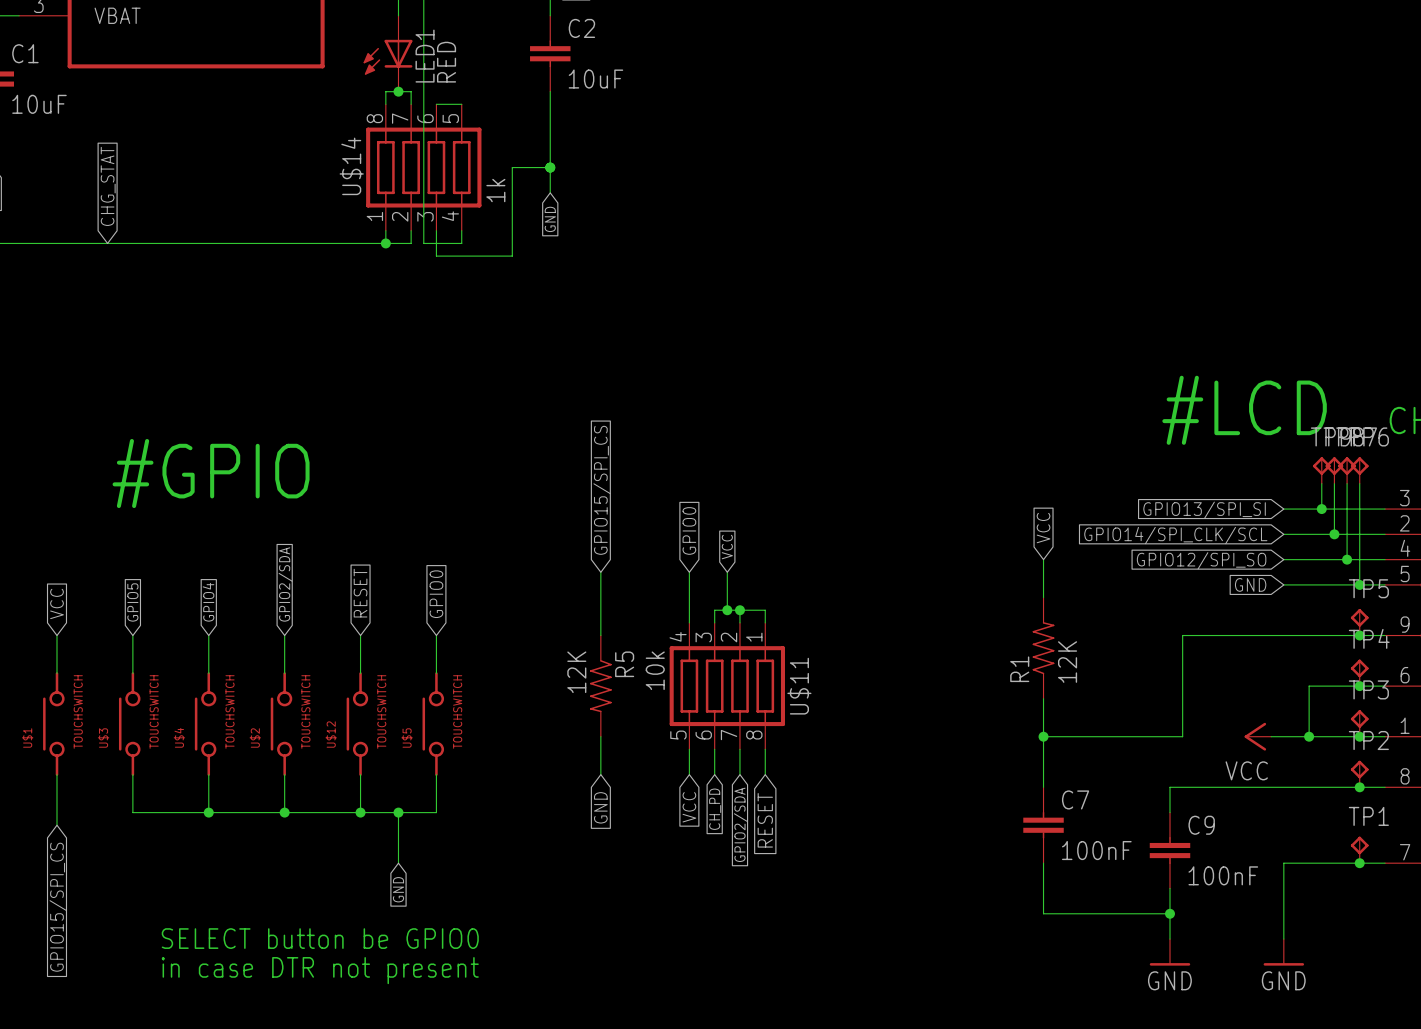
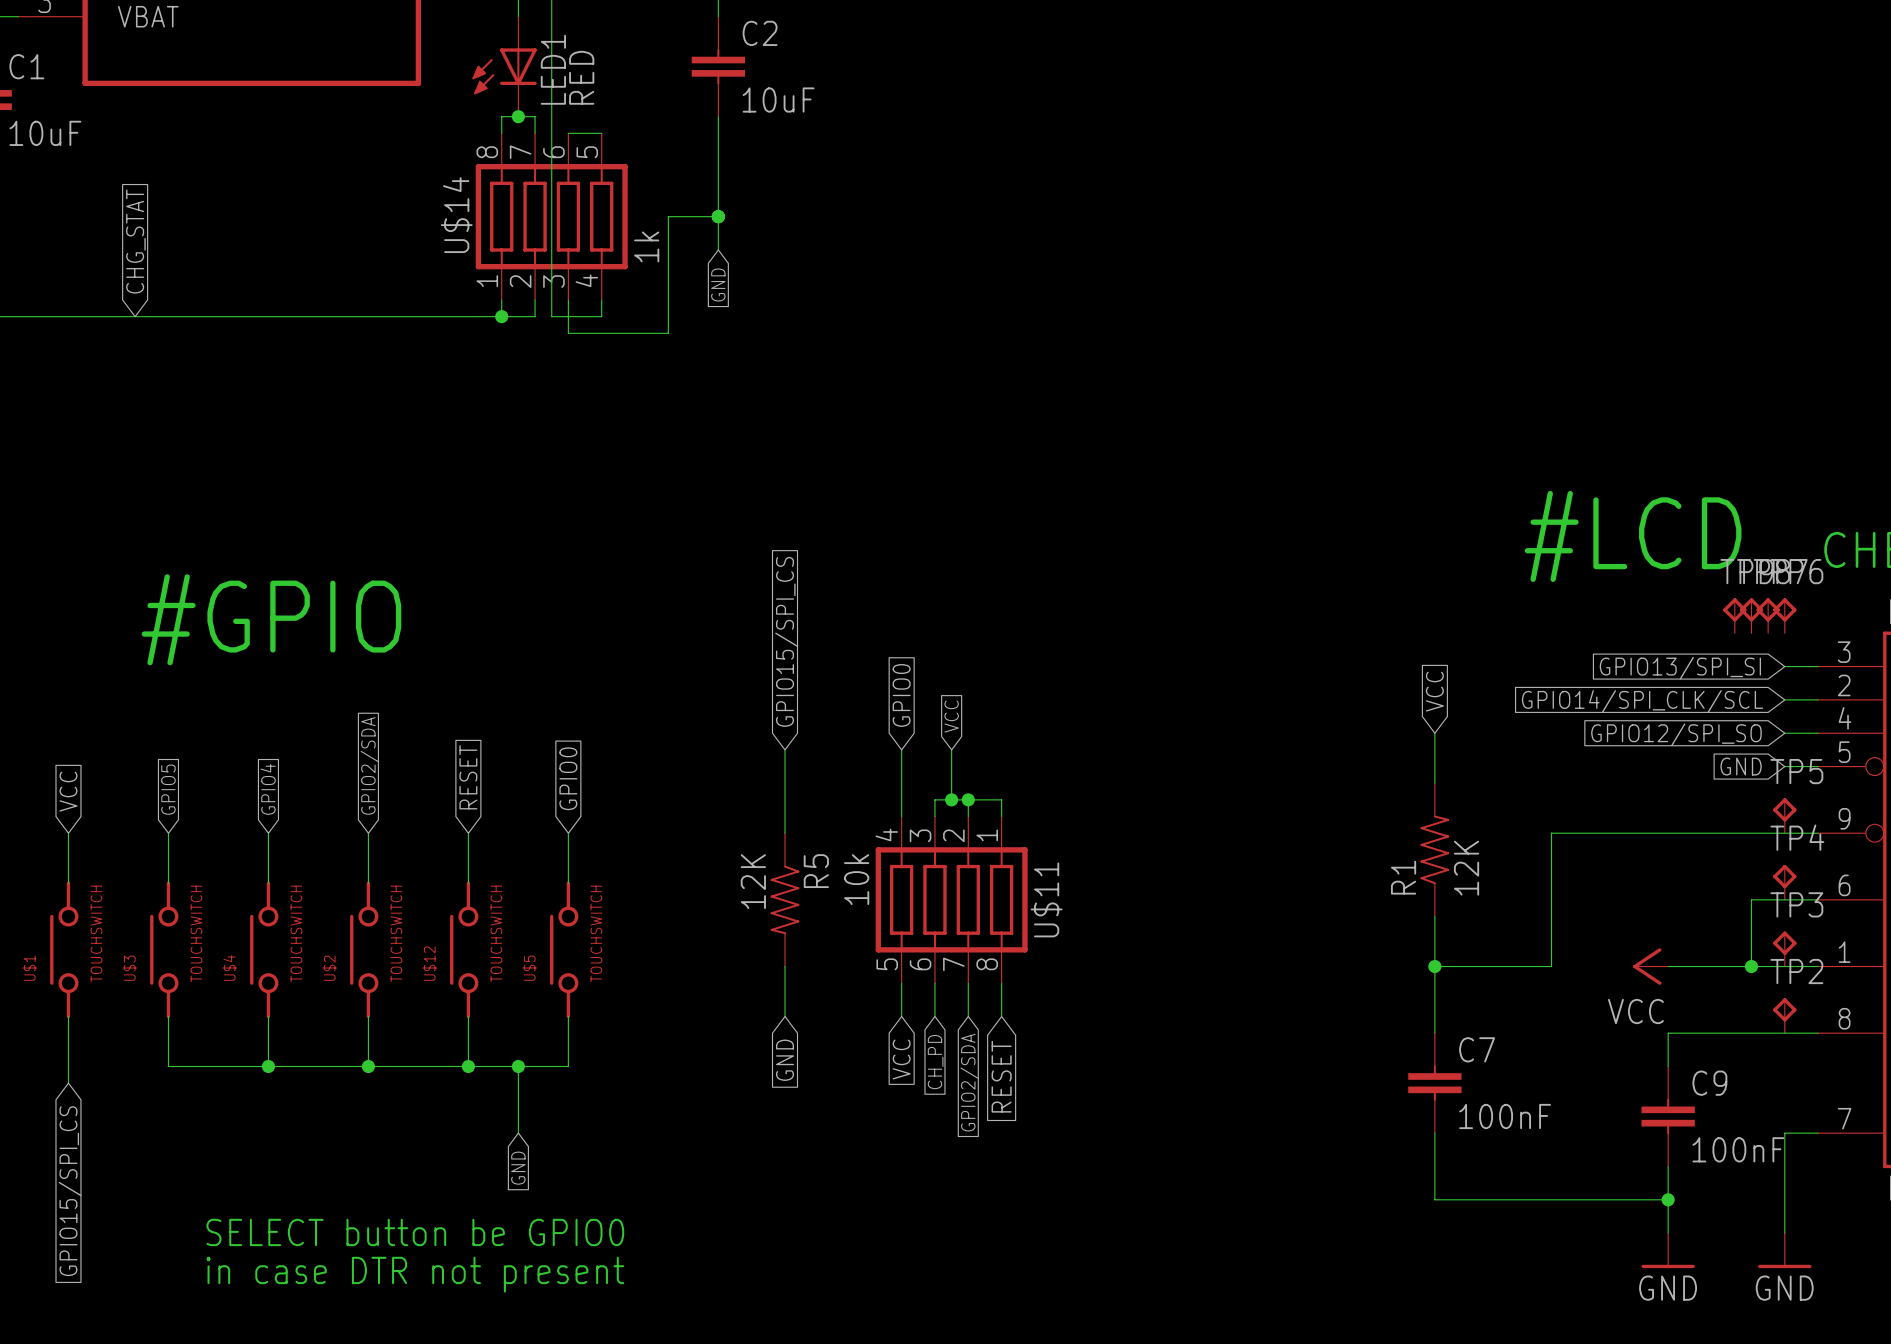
wire: (1321, 483) (1321, 509) -> none
wire: (1334, 483) (1334, 534) -> none
wire: (1347, 483) (1347, 559) -> none
wire: (1359, 483) (1359, 584) (1283, 584) -> none
wire: (1283, 509) (1359, 509) -> none
junction: (1321, 509) -> none
global label position: GPIO13/SPI_SI (1204, 510) -> GPIO13/SPI_SI (1680, 668)
global label position: VCC (1043, 528) -> VCC (1434, 691)
wire: (1283, 534) (1359, 534) -> none
junction: (1334, 534) -> none
global label position: GPIO14/SPI_CLK/SCL (1175, 535) -> GPIO14/SPI_CLK/SCL (1642, 701)
wire: (1043, 559) (1043, 597) -> (1434, 733) (1434, 783)
wire: (1283, 559) (1359, 559) -> none
junction: (1347, 559) -> none
global label position: GPIO12/SPI_SO (1201, 560) -> GPIO12/SPI_SO (1676, 734)
global label position: GND (1250, 584) -> GND (1741, 766)
junction: (1359, 584) -> none
junction: (1359, 635) -> none
R1 position: (1043, 648) -> (1434, 849)
wire: (1334, 686) (1309, 686) (1309, 736) -> (1751, 899) (1751, 966)
junction: (1359, 686) -> none
wire: (1043, 698) (1043, 787) -> (1434, 916) (1434, 1033)
wire: (1043, 736) (1094, 736) -> none
junction position: (1043, 736) -> (1434, 966)
junction: (1309, 736) -> none
junction: none -> (1751, 966)
junction: (1359, 736) -> none
wire: (1271, 787) (1170, 787) (1170, 812) -> (1668, 1033) (1668, 1066)
junction: (1359, 787) -> none
C7 position: (1043, 825) -> (1434, 1083)
TP1: (1359, 849) -> none
C9 position: (1170, 850) -> (1668, 1116)
wire: (1043, 863) (1043, 913) (1094, 913) -> (1434, 1133) (1434, 1199)
wire: (1359, 863) (1283, 863) (1283, 939) -> (1784, 1133) (1784, 1233)
junction: (1359, 863) -> none
wire: (1170, 888) (1170, 939) -> (1668, 1166) (1668, 1233)
wire: none -> (1534, 1199) (1668, 1199)
junction: (1170, 913) -> none
junction: none -> (1668, 1199)
power symbol: GND (1170, 952) -> none
power symbol position: GND (1283, 952) -> GND (1668, 1250)
power symbol: none -> GND (1784, 1250)

